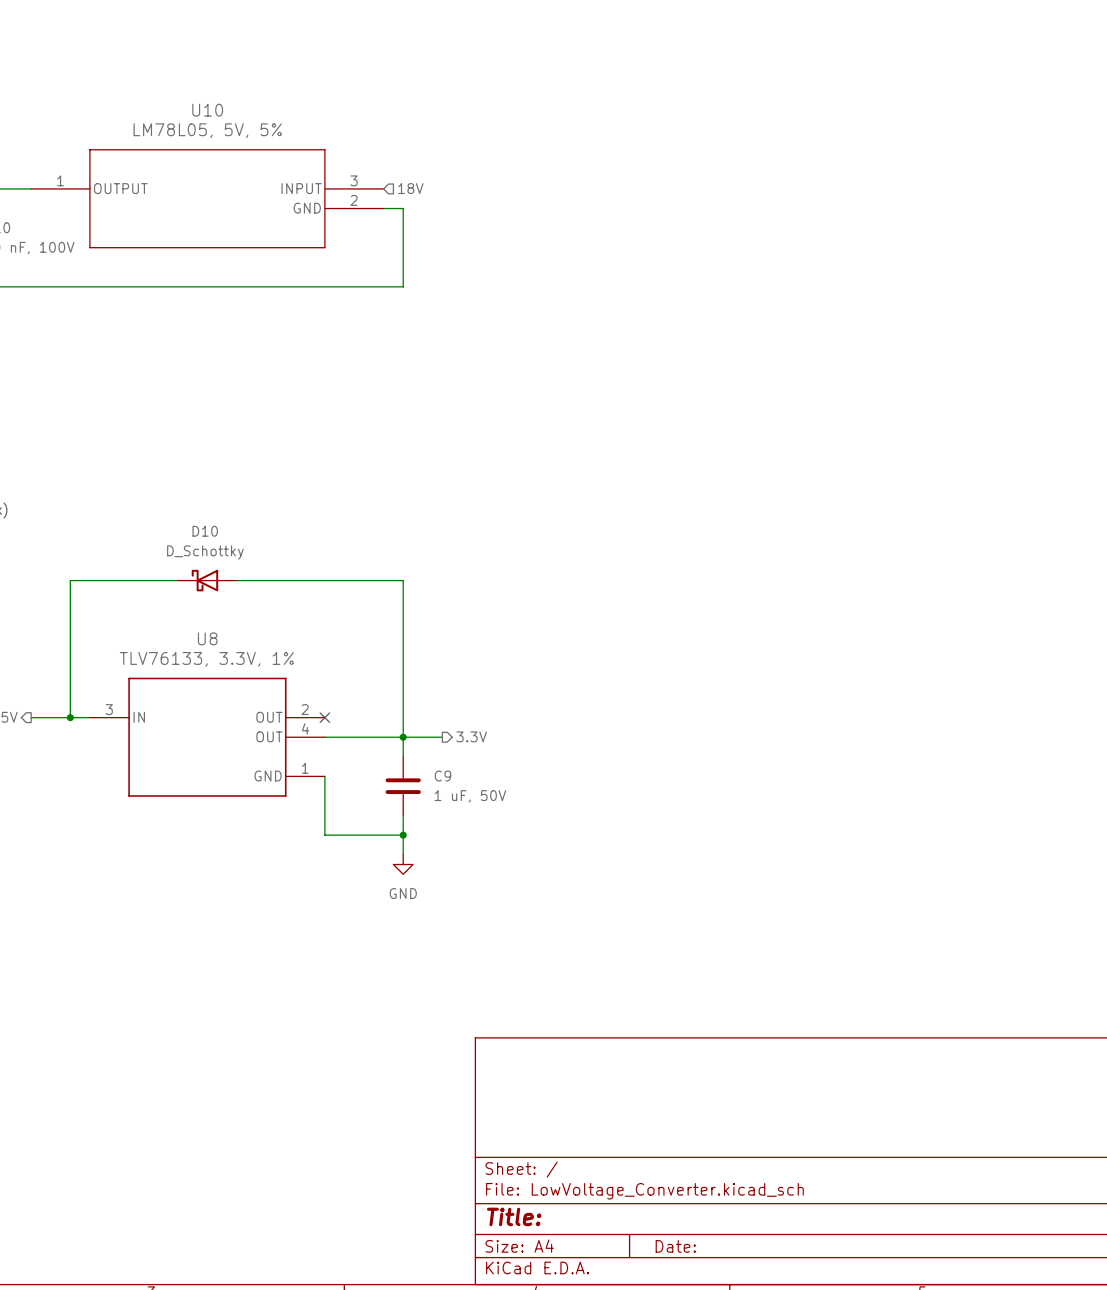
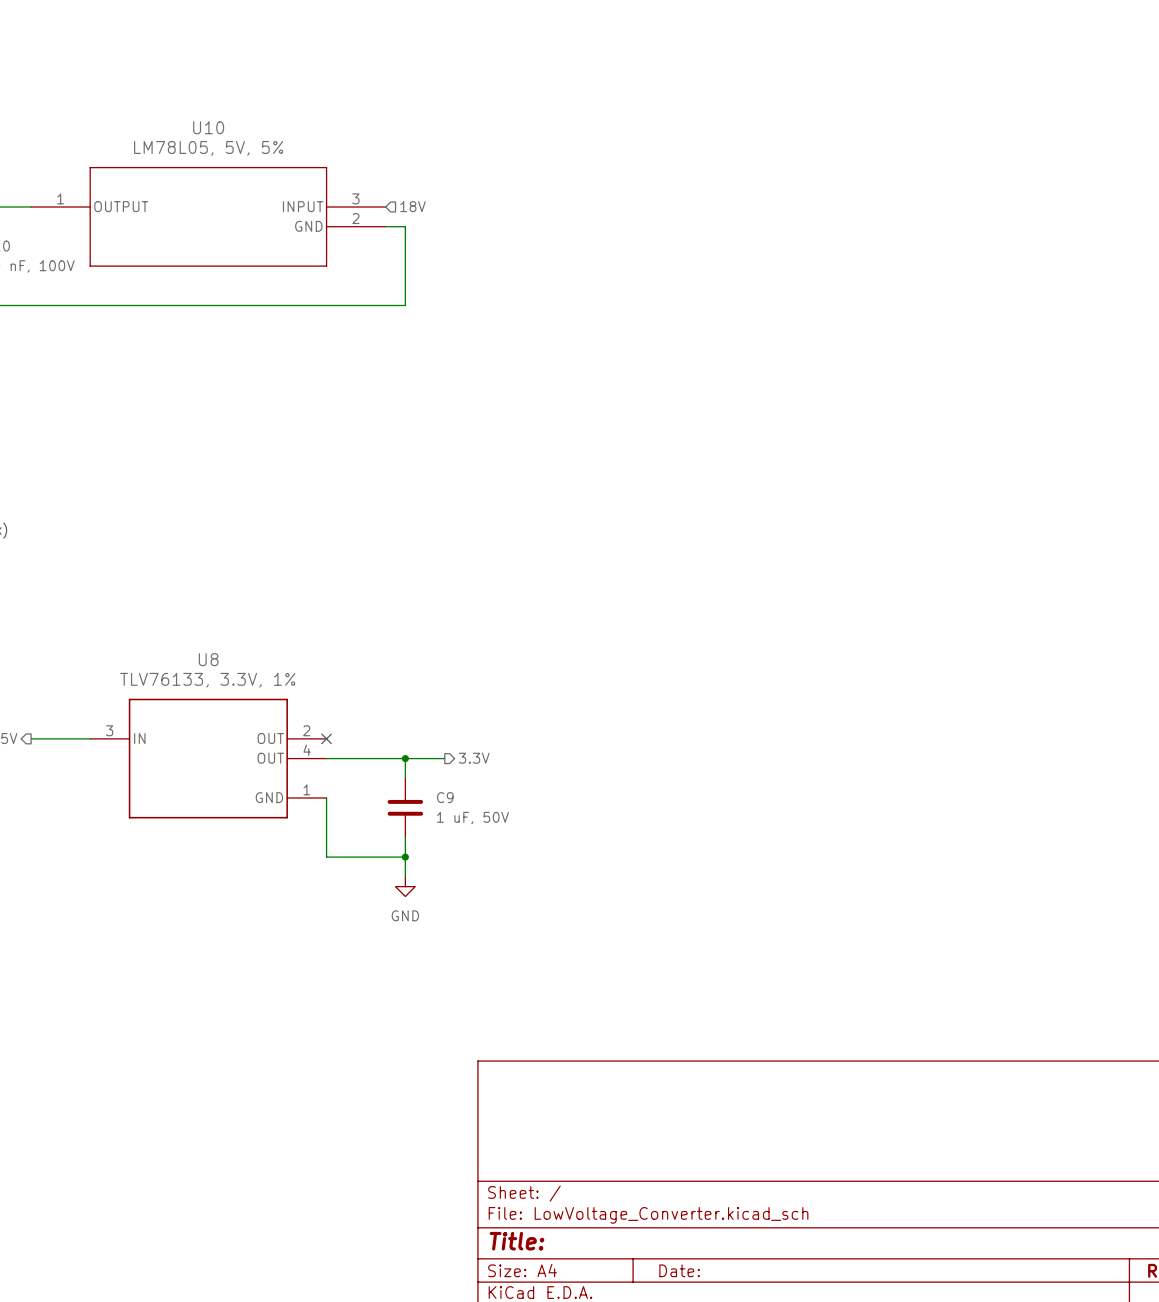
wire: (178, 580) (70, 580) (70, 717) -> none
D10: D_Schottky (207, 580) -> none
wire: (236, 580) (403, 580) (403, 737) -> none
junction: (70, 717) -> none

